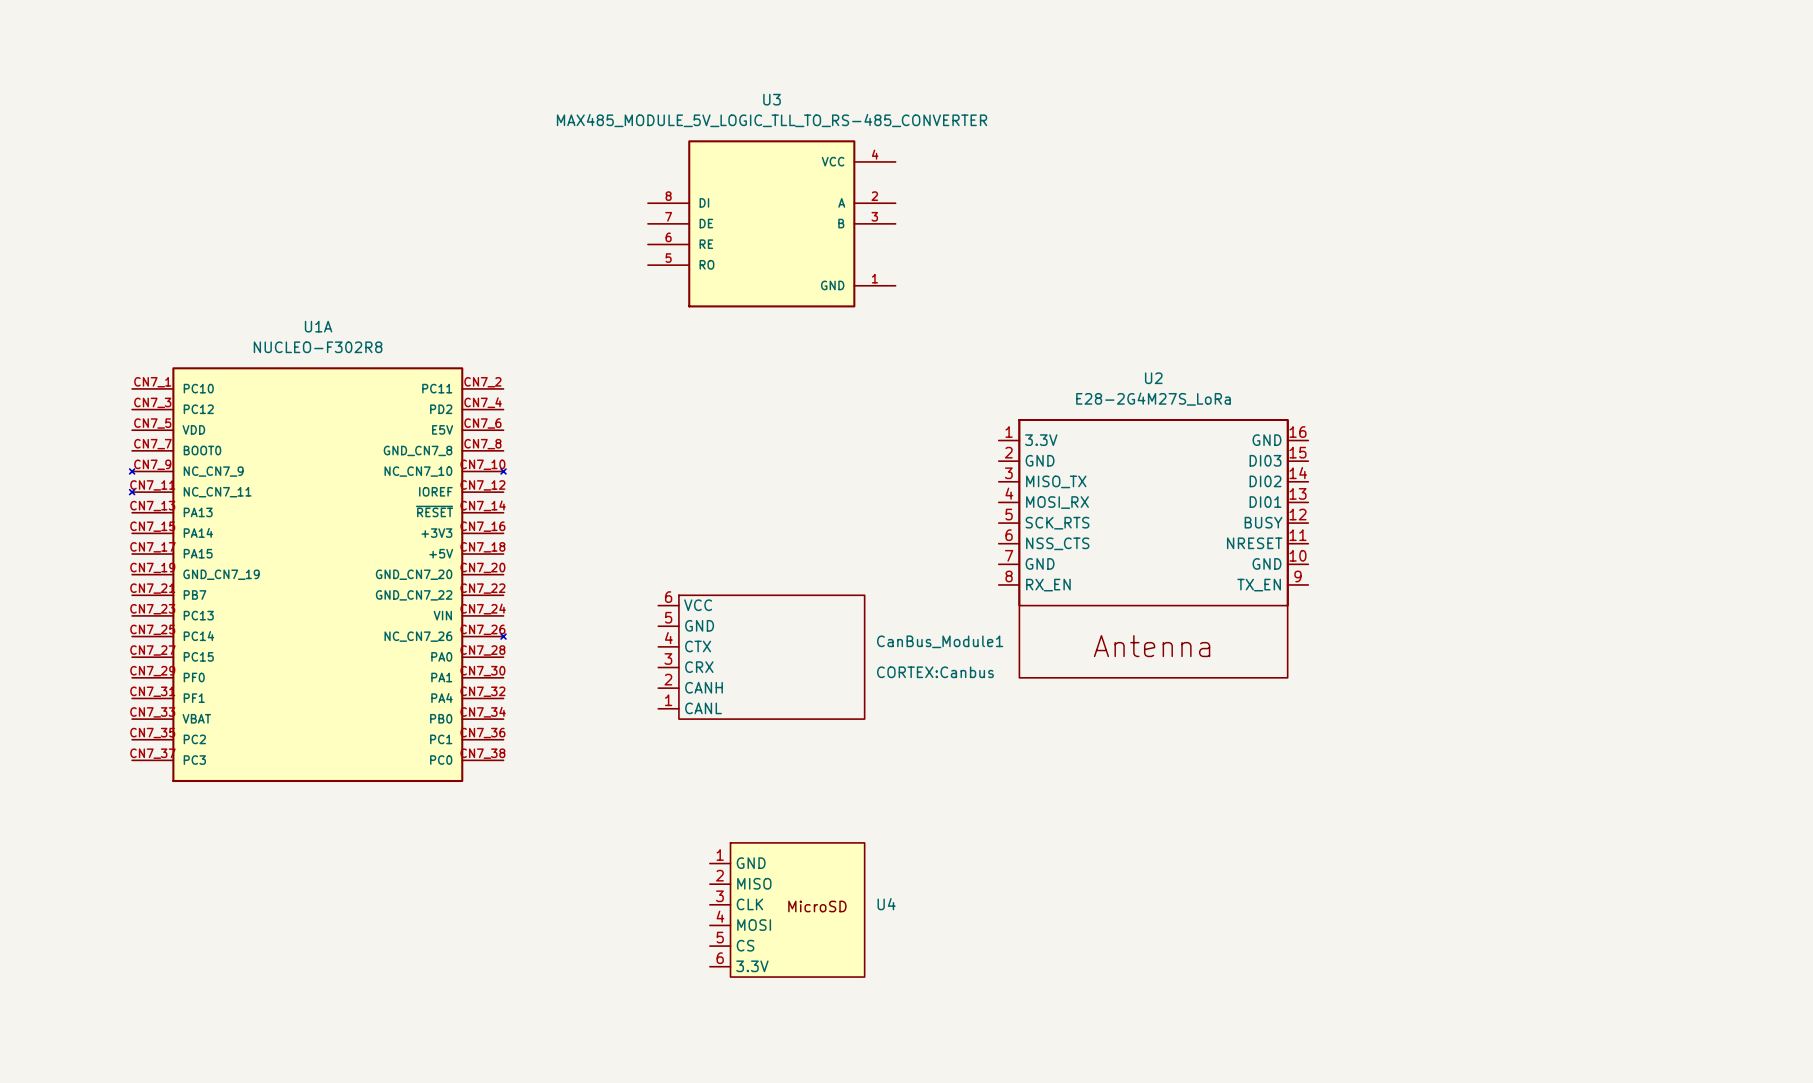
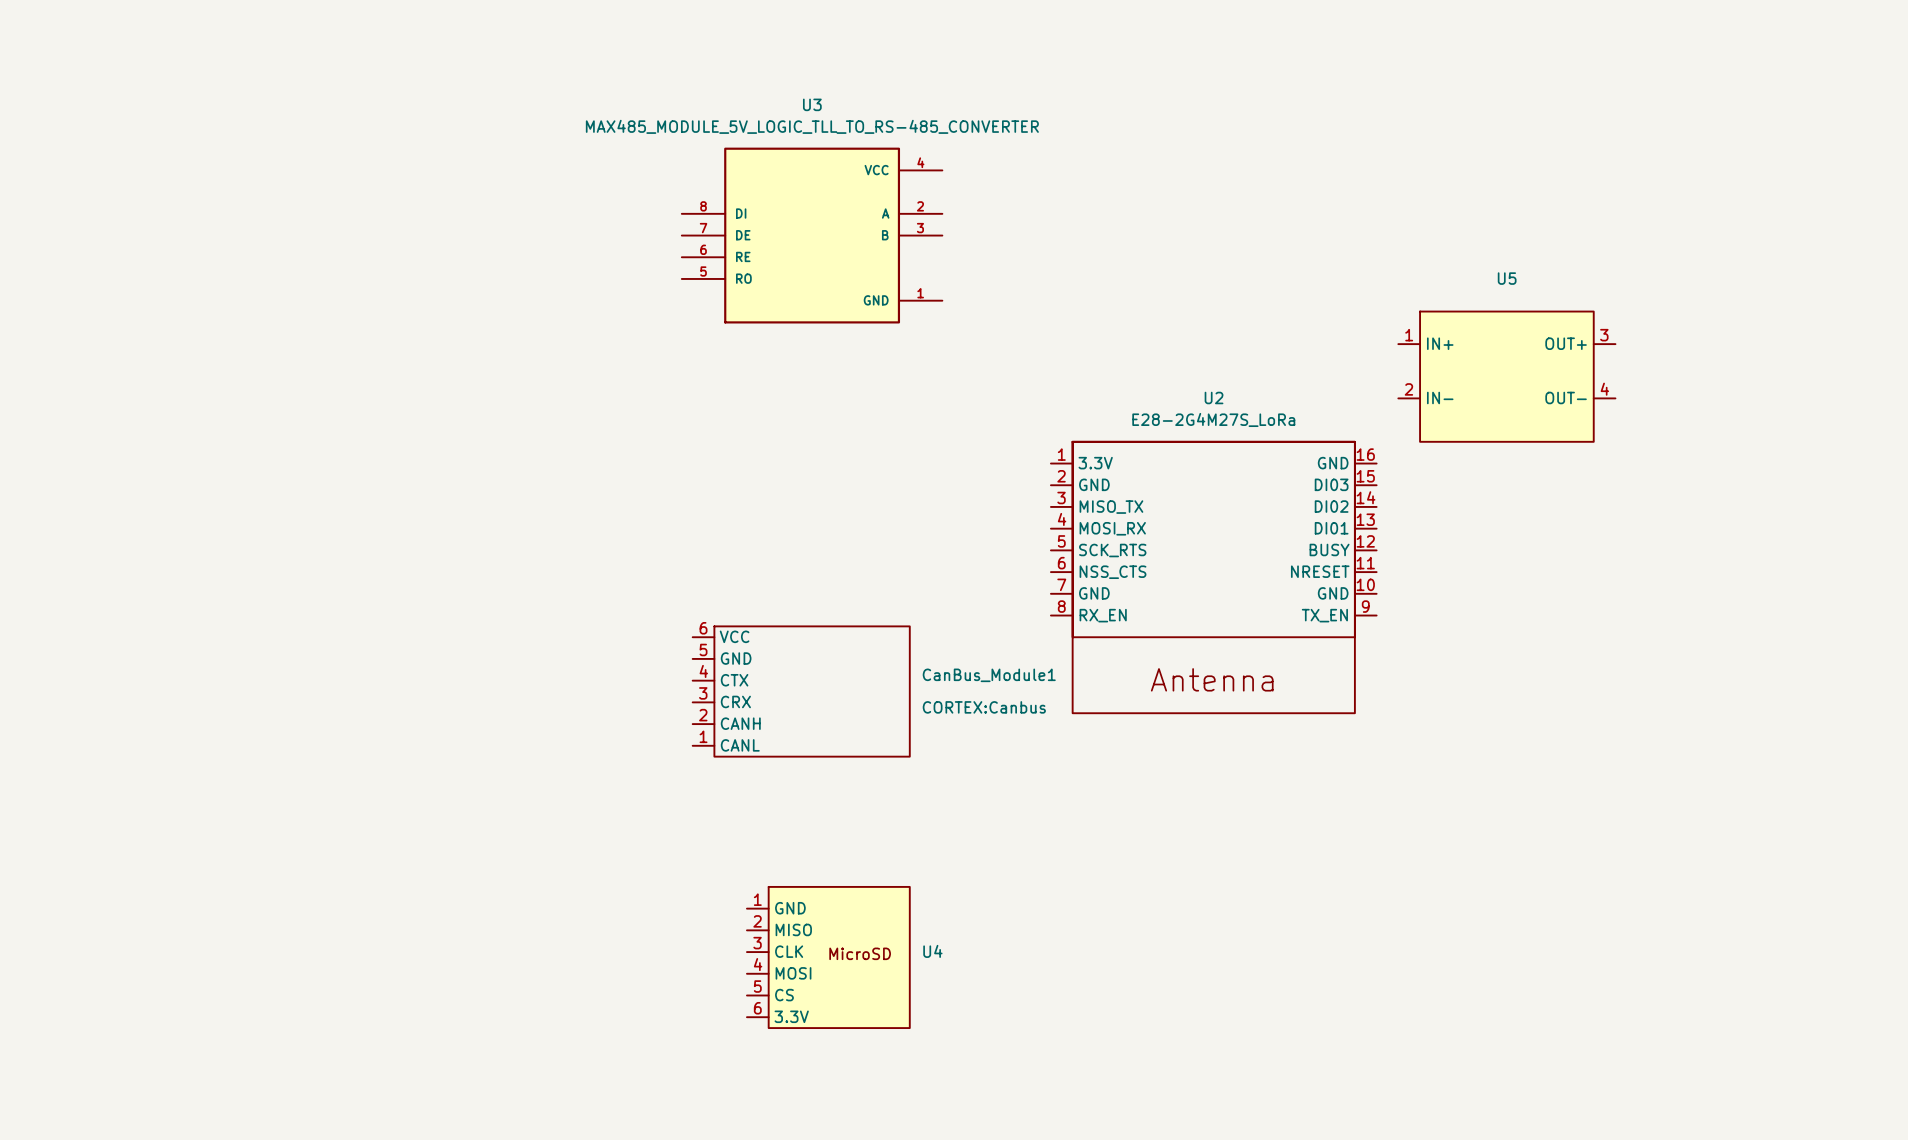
U5: none -> (1506, 376)
U1A: NUCLEO-F302R8 (317, 574) -> none

